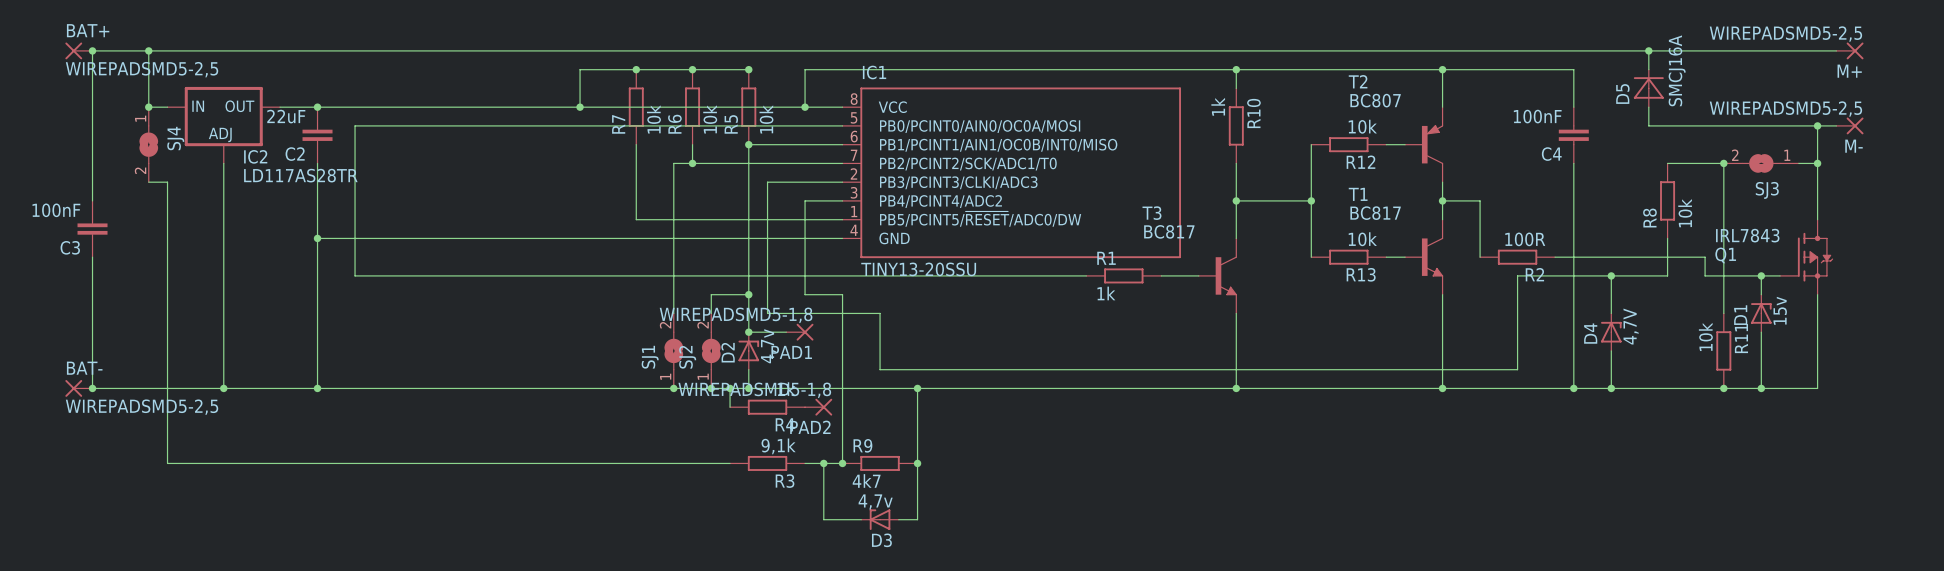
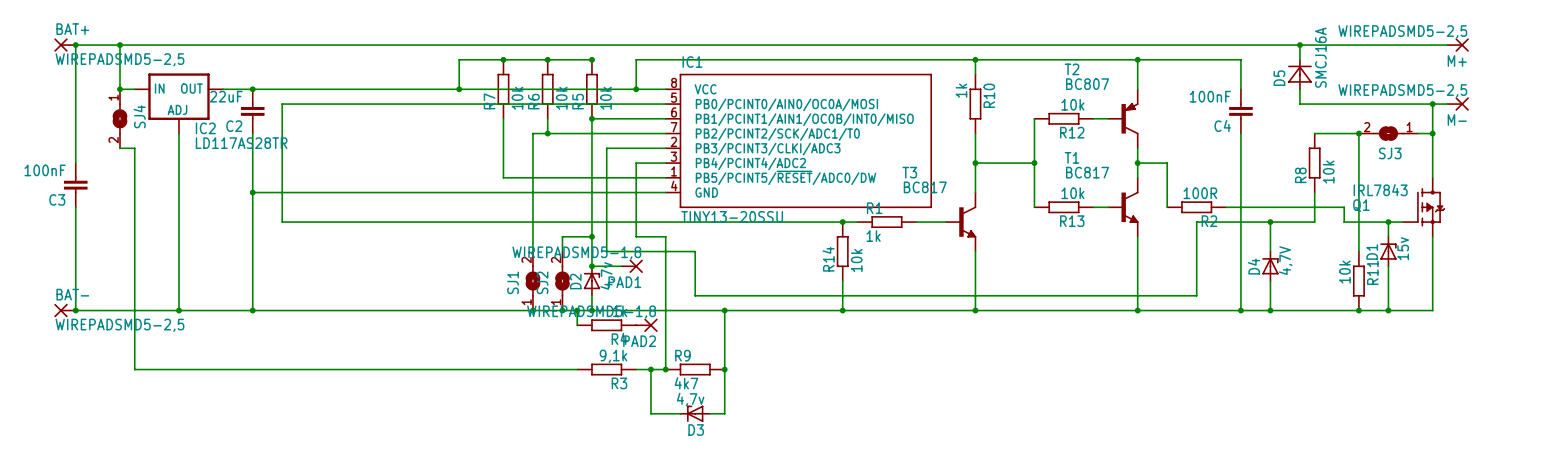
junction: none -> (842, 222)
R14: none -> 10k (842, 251)
wire: none -> (842, 281) (842, 310)
junction: none -> (842, 310)

